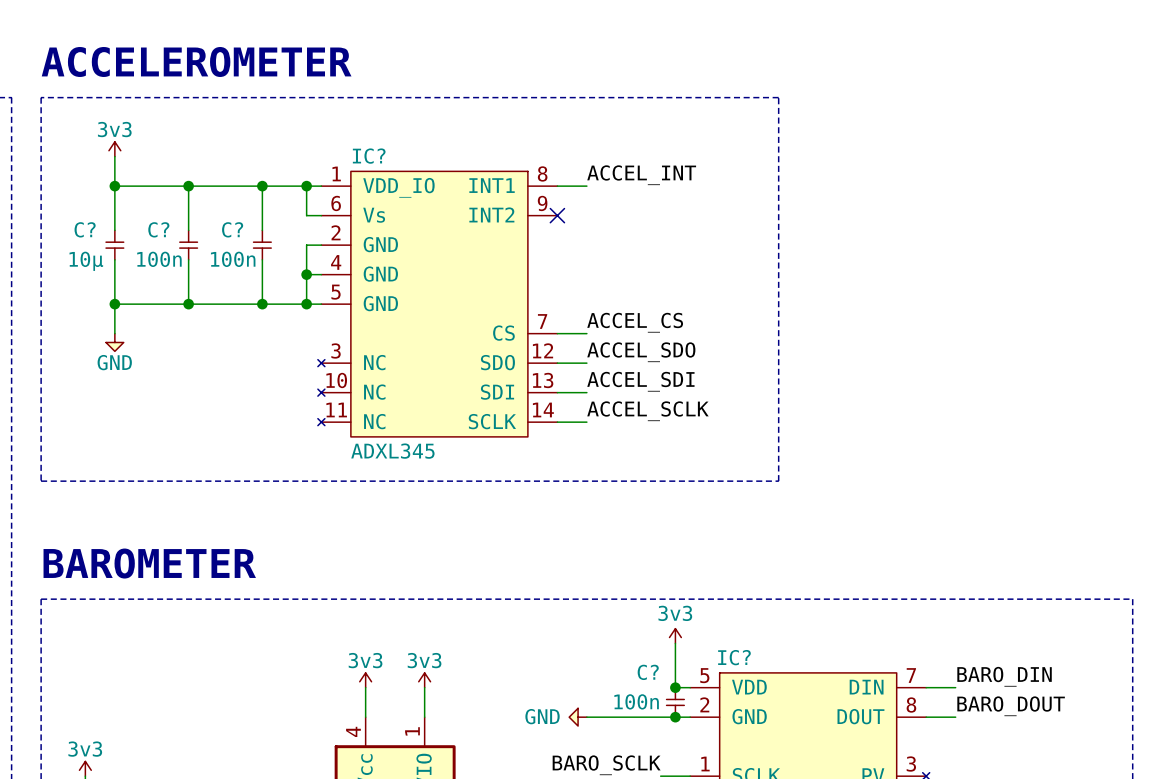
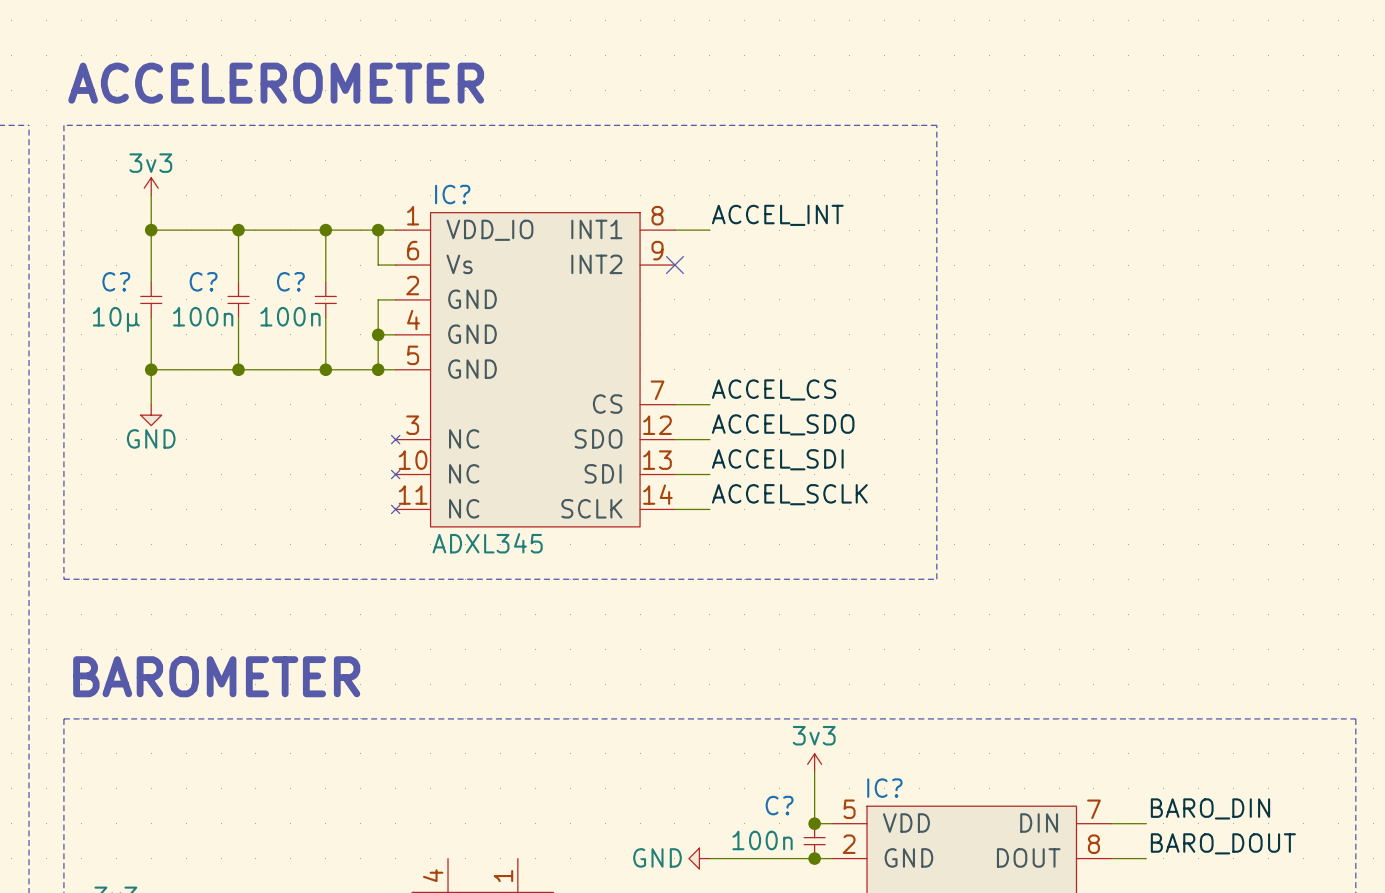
power symbol: 3v3 (365, 680) -> none
power symbol: 3v3 (424, 680) -> none
wire: (365, 687) (365, 717) -> none
wire: (424, 687) (424, 717) -> none

